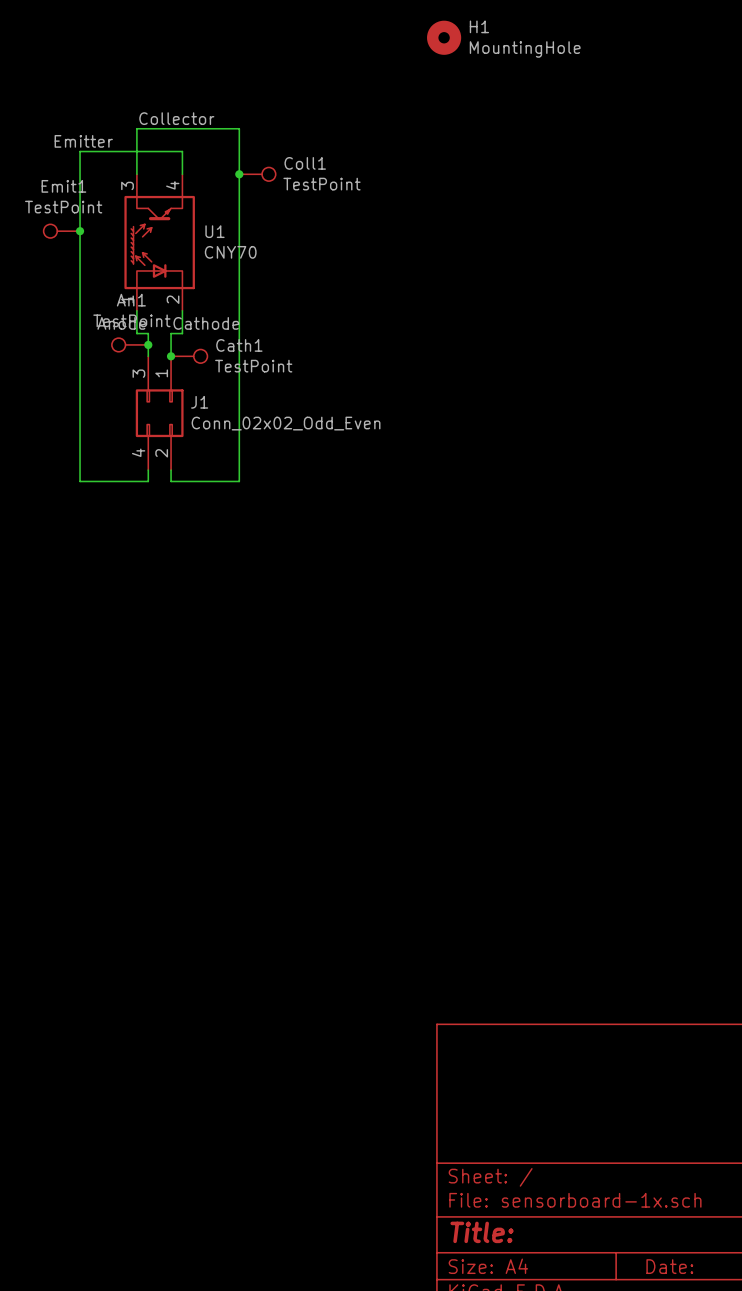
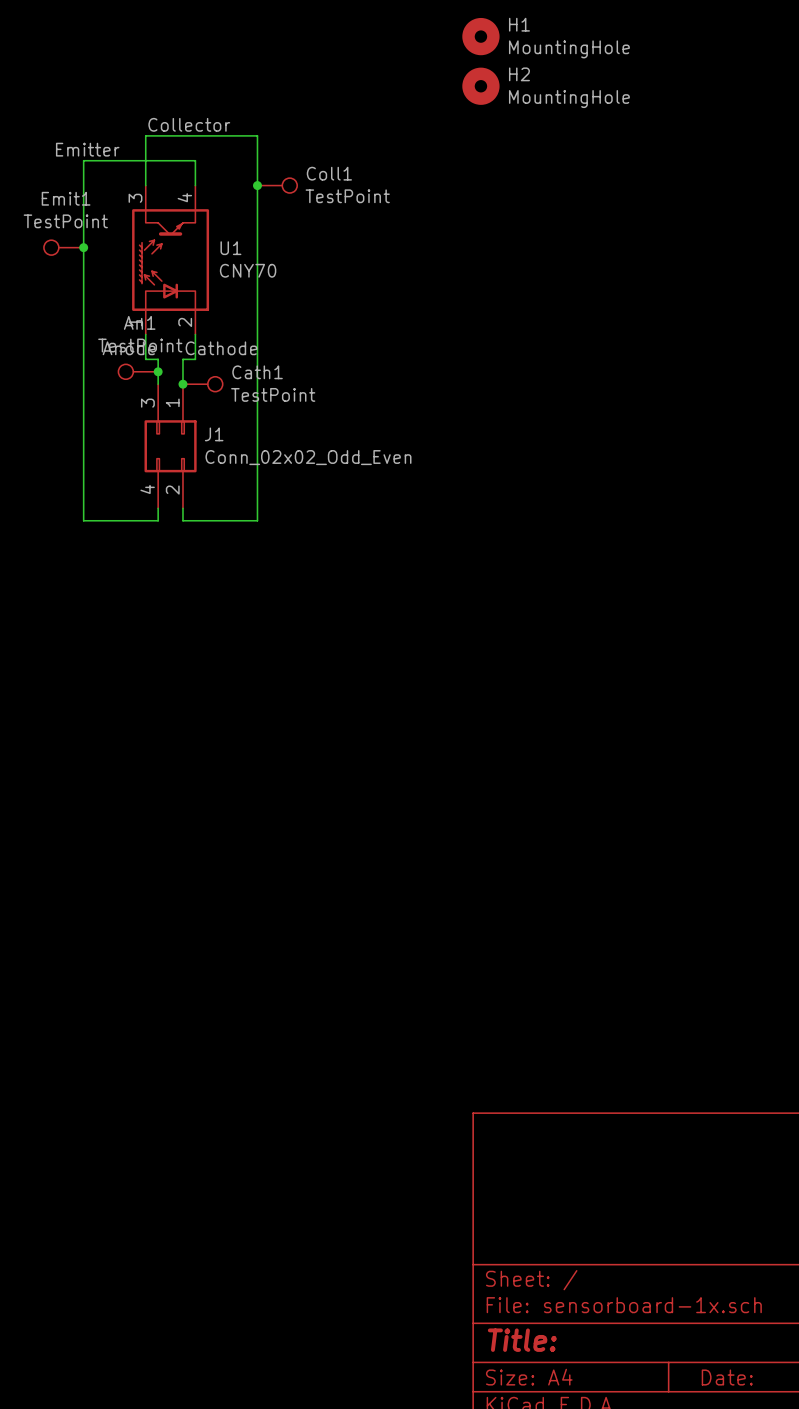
H2: none -> MountingHole (480, 86)

